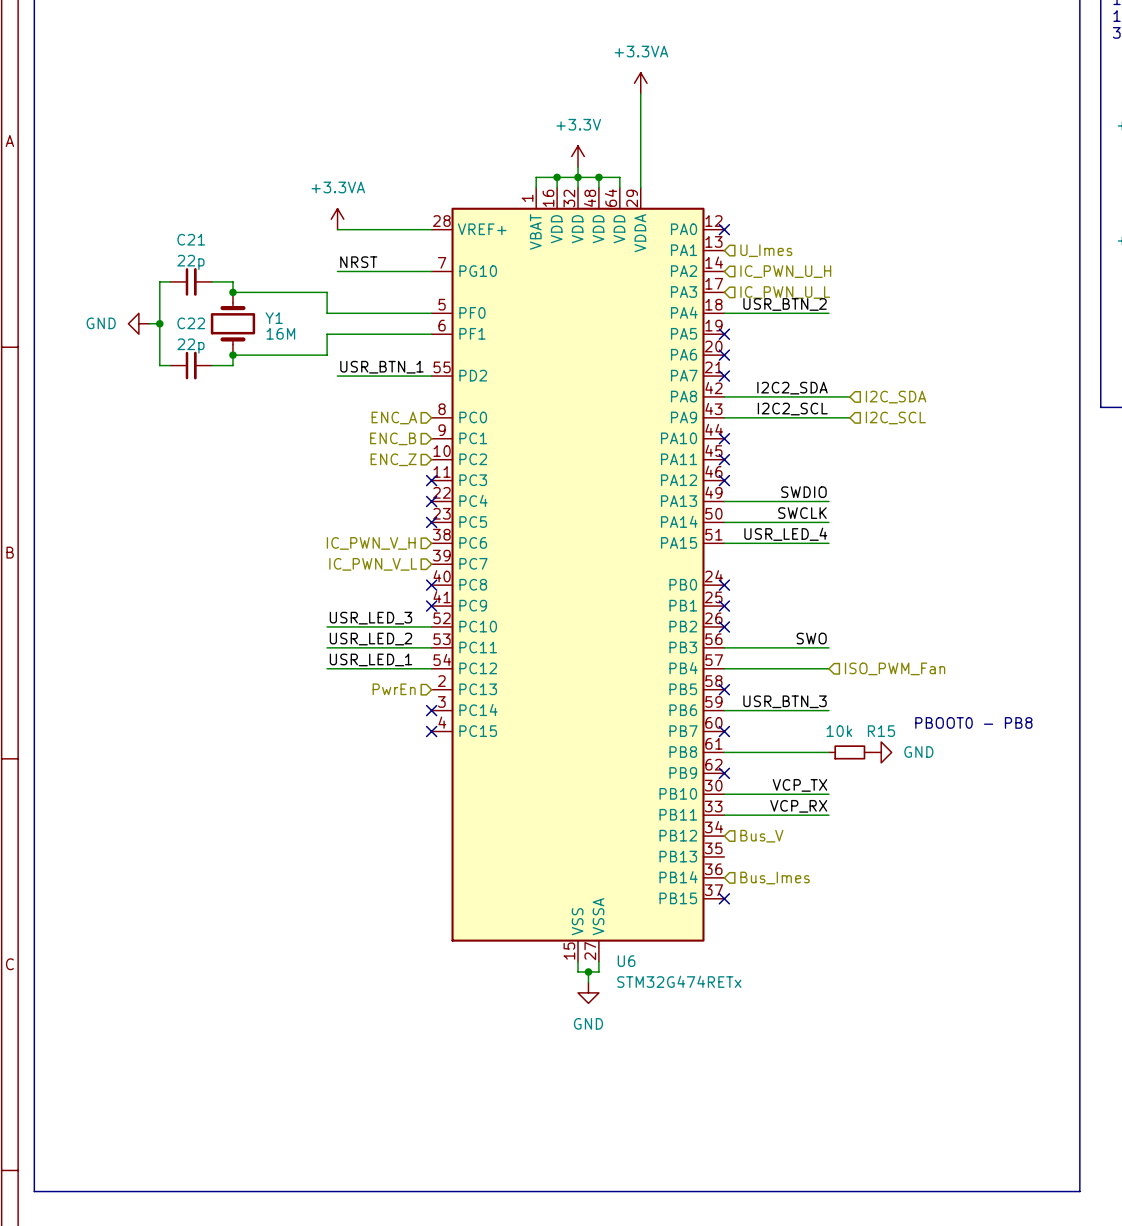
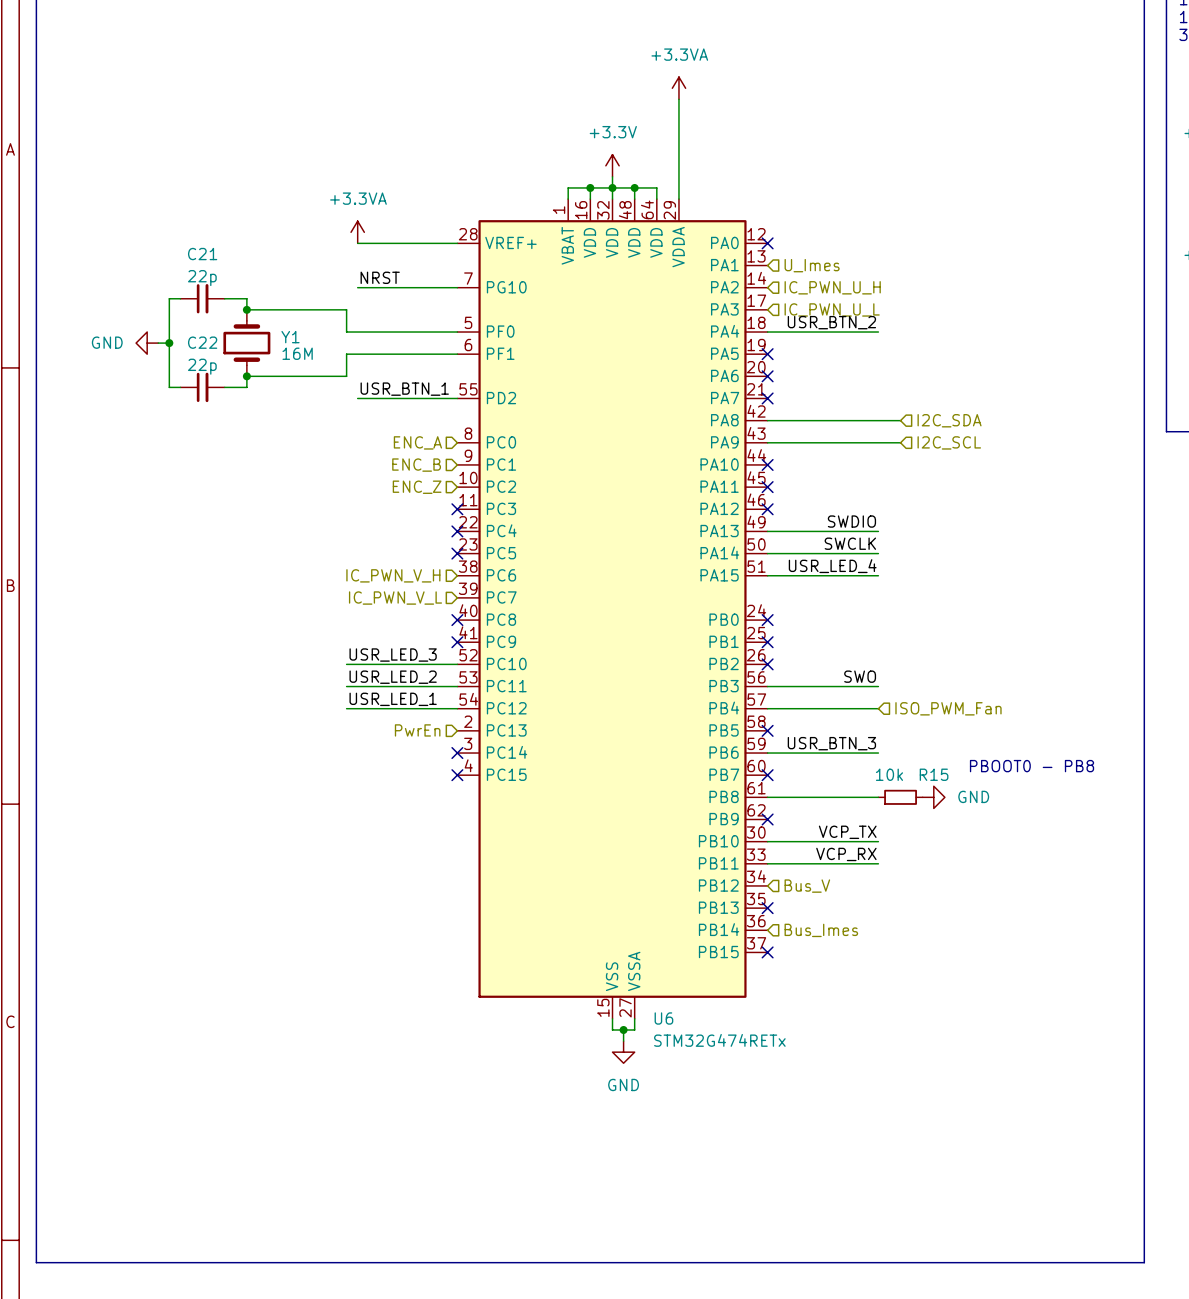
label: I2C2_SDA (792, 388) -> none
label: I2C2_SCL (792, 409) -> none
no-connect mark: none -> (767, 908)

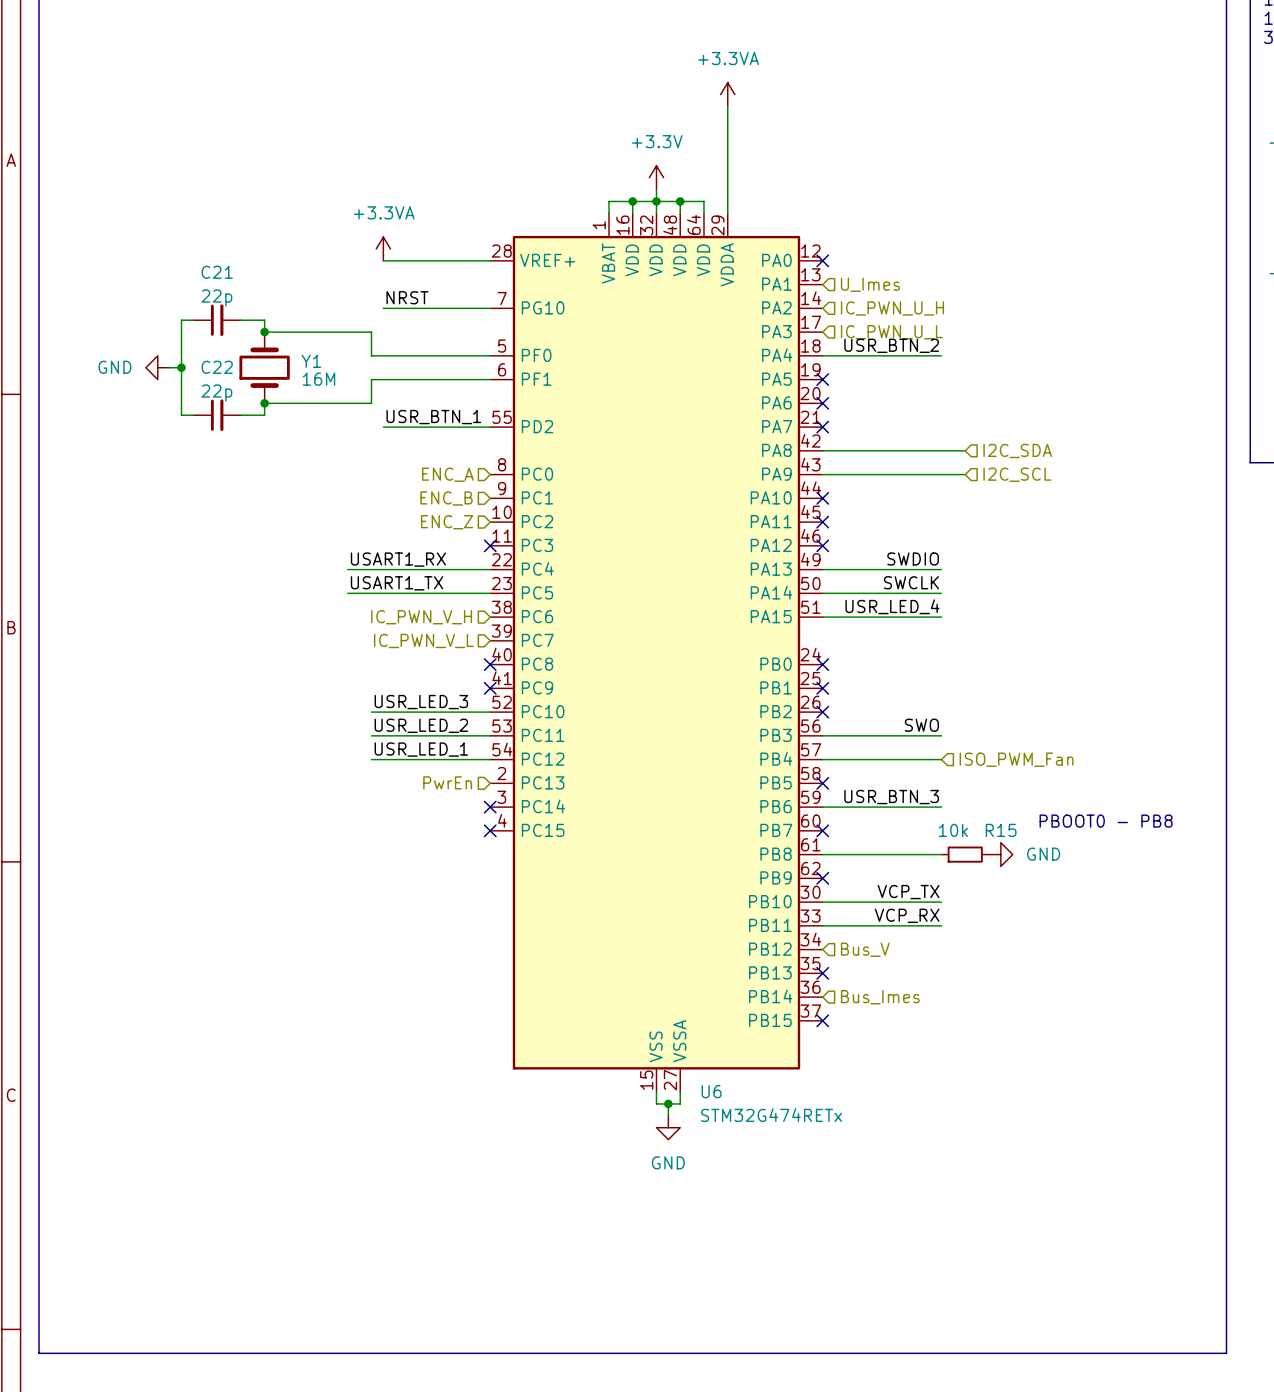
label: none -> USART1_RX (398, 559)
wire: none -> (347, 569) (490, 569)
no-connect mark: (457, 531) -> none
label: none -> USART1_TX (397, 583)
wire: none -> (347, 593) (490, 593)
no-connect mark: (457, 553) -> none

